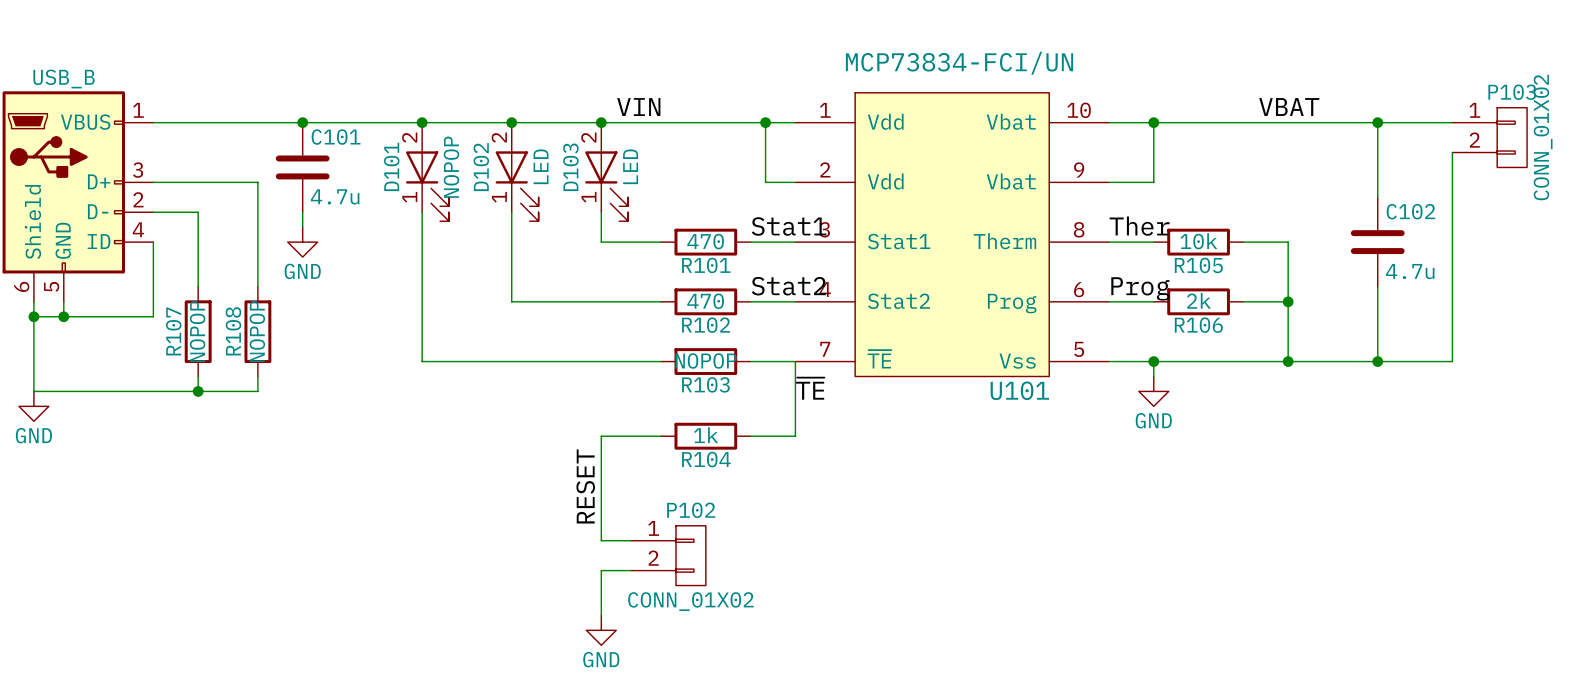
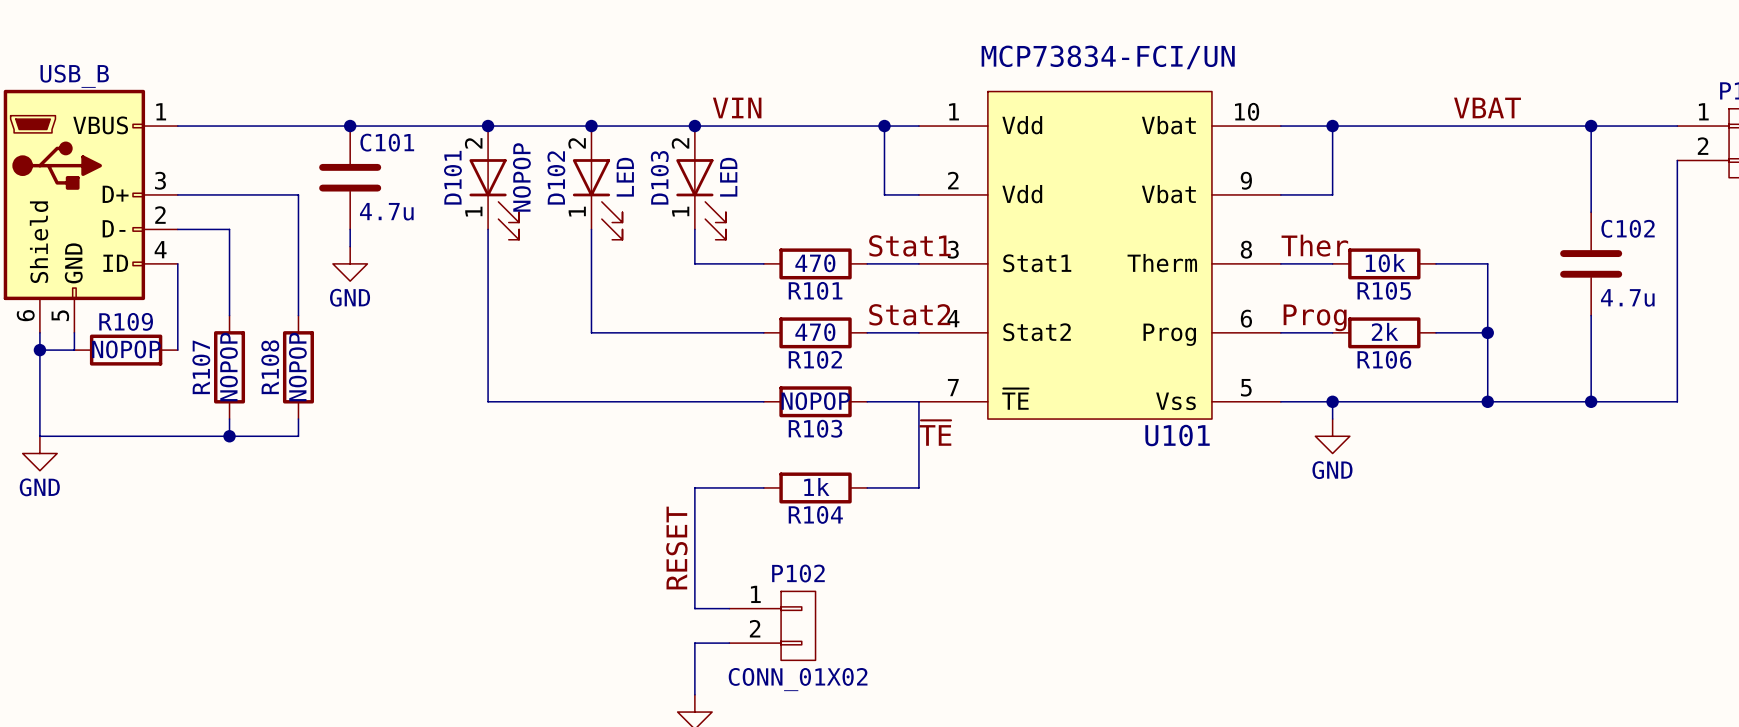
junction: (63, 316) -> none
R109: none -> NOPOP (126, 350)

